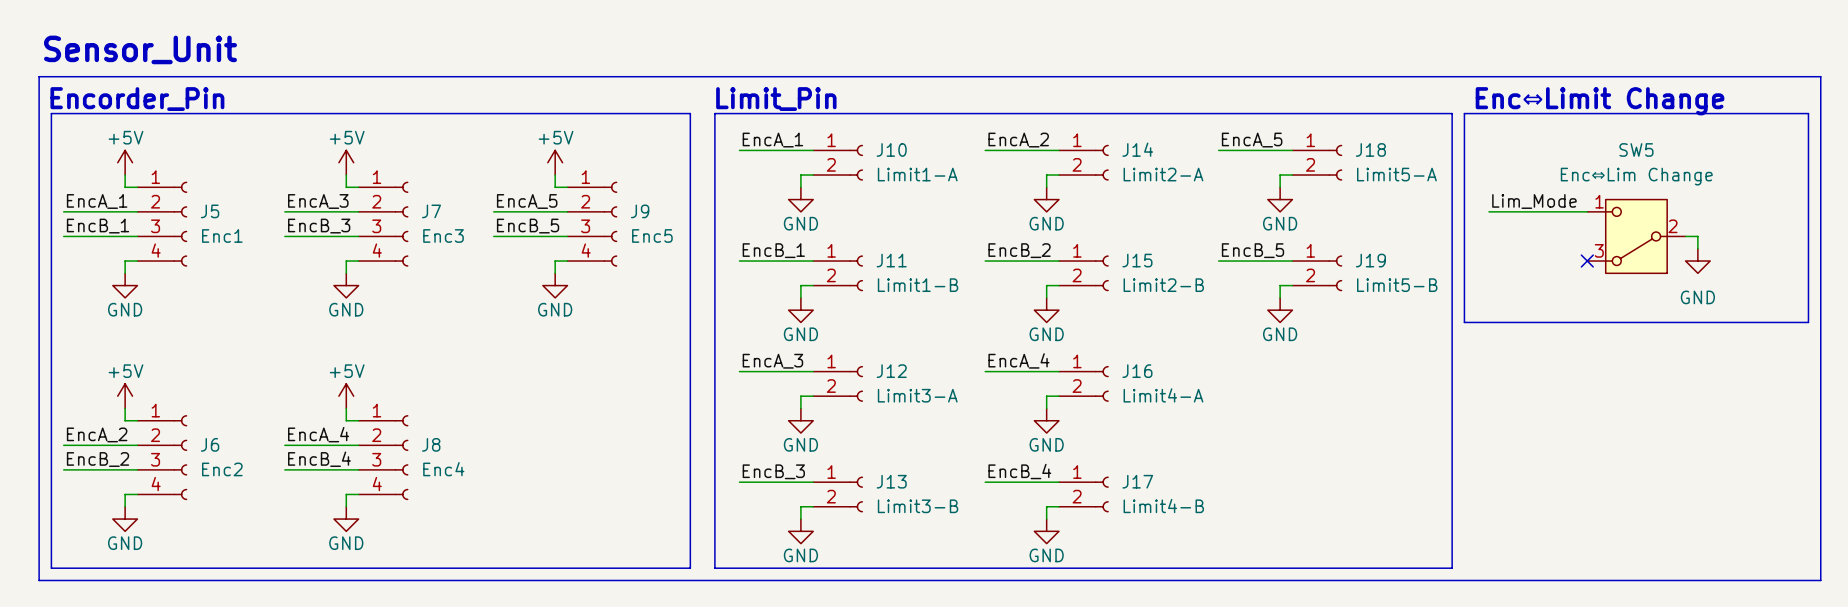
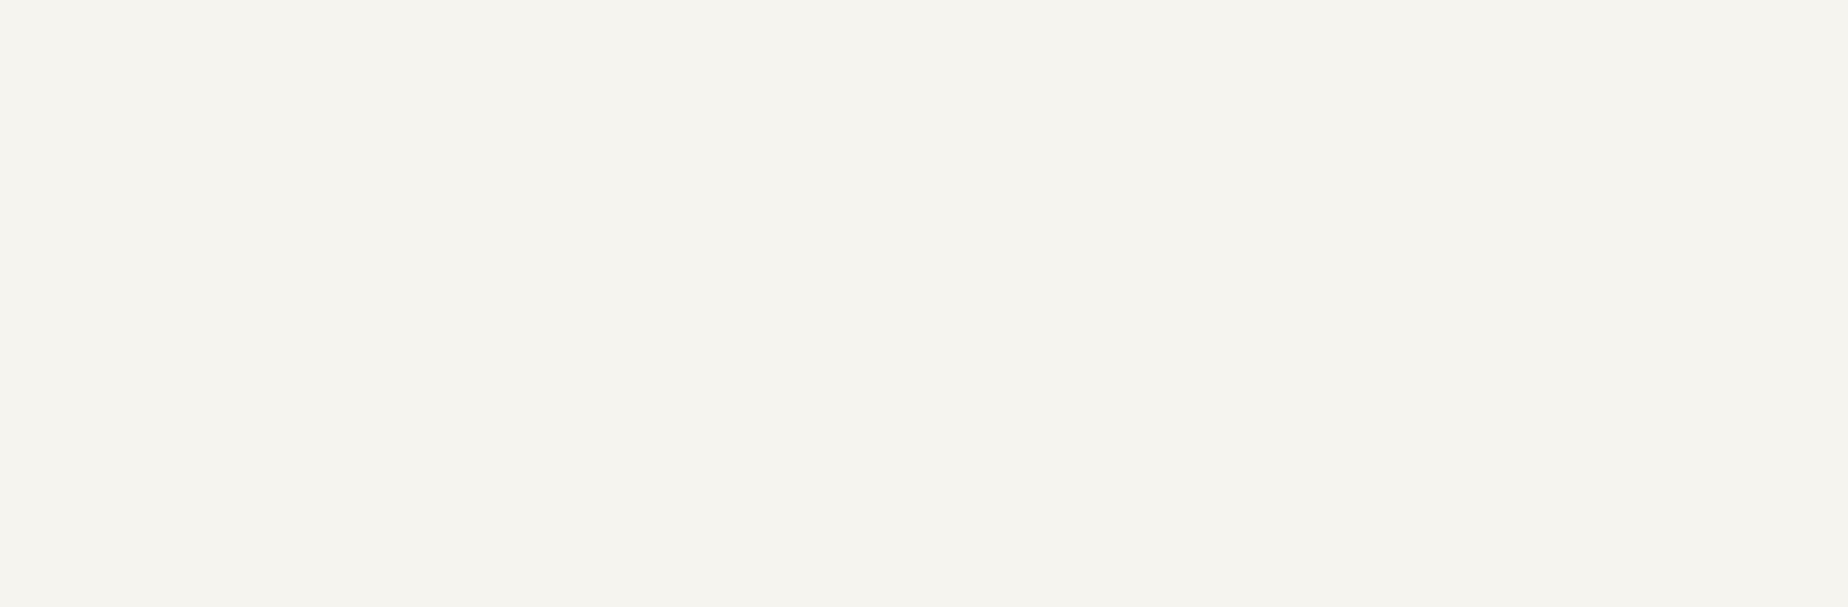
text: Sensor_Unit (140, 49) -> none
line: (39, 76) (1820, 76) (1820, 580) (39, 580) (39, 76) -> none
text: Encorder_Pin (137, 99) -> none
text: Limit_Pin (776, 99) -> none
text: Enc⇔Limit Change (1600, 101) -> none
line: (51, 113) (690, 113) (690, 568) (51, 568) (51, 113) -> none
line: (714, 113) (1452, 113) (1452, 568) (714, 568) (714, 113) -> none
line: (1464, 113) (1808, 113) (1808, 322) (1464, 322) (1464, 113) -> none
label: EncA_1 (772, 140) -> none
label: EncA_2 (1018, 140) -> none
label: EncA_5 (1252, 140) -> none
wire: (739, 150) (813, 150) -> none
wire: (985, 150) (1058, 150) -> none
wire: (1218, 150) (1292, 150) -> none
power symbol: +5V (125, 162) -> none
power symbol: +5V (346, 162) -> none
power symbol: +5V (555, 162) -> none
J10: Limit1-A (838, 162) -> none
J14: Limit2-A (1083, 162) -> none
J18: Limit5-A (1317, 162) -> none
wire: (125, 175) (125, 187) (137, 187) -> none
wire: (346, 175) (346, 187) (358, 187) -> none
wire: (555, 175) (555, 187) (567, 187) -> none
wire: (813, 175) (800, 175) (800, 187) -> none
wire: (1058, 175) (1046, 175) (1046, 187) -> none
wire: (1292, 175) (1280, 175) (1280, 187) -> none
power symbol: GND (800, 199) -> none
power symbol: GND (1046, 199) -> none
power symbol: GND (1280, 199) -> none
label: EncA_1 (97, 201) -> none
label: EncA_3 (318, 201) -> none
label: EncA_5 (527, 201) -> none
label: Lim_Mode (1534, 201) -> none
wire: (63, 211) (137, 211) -> none
wire: (284, 211) (358, 211) -> none
wire: (493, 211) (567, 211) -> none
wire: (1489, 211) (1587, 211) -> none
J5: Enc1 (162, 224) -> none
J7: Enc3 (383, 224) -> none
J9: Enc5 (592, 224) -> none
label: EncB_1 (98, 226) -> none
label: EncB_3 (319, 226) -> none
label: EncB_5 (528, 226) -> none
wire: (63, 236) (137, 236) -> none
wire: (284, 236) (358, 236) -> none
wire: (493, 236) (567, 236) -> none
SW5: Enc⇔Lim Change (1636, 236) -> none
wire: (1685, 236) (1697, 236) (1697, 248) -> none
label: EncB_1 (773, 250) -> none
label: EncB_2 (1019, 250) -> none
label: EncB_5 (1253, 250) -> none
wire: (137, 261) (125, 261) (125, 273) -> none
wire: (358, 261) (346, 261) (346, 273) -> none
wire: (567, 261) (555, 261) (555, 273) -> none
wire: (739, 261) (813, 261) -> none
wire: (985, 261) (1058, 261) -> none
wire: (1218, 261) (1292, 261) -> none
no-connect mark: (1587, 261) -> none
power symbol: GND (1697, 261) -> none
J11: Limit1-B (838, 273) -> none
J15: Limit2-B (1083, 273) -> none
J19: Limit5-B (1317, 273) -> none
power symbol: GND (125, 285) -> none
power symbol: GND (346, 285) -> none
power symbol: GND (555, 285) -> none
wire: (813, 285) (800, 285) (800, 297) -> none
wire: (1058, 285) (1046, 285) (1046, 297) -> none
wire: (1292, 285) (1280, 285) (1280, 297) -> none
power symbol: GND (800, 310) -> none
power symbol: GND (1046, 310) -> none
power symbol: GND (1280, 310) -> none
label: EncA_4 (1018, 360) -> none
label: EncA_3 (772, 361) -> none
wire: (739, 371) (813, 371) -> none
wire: (985, 371) (1058, 371) -> none
J12: Limit3-A (838, 383) -> none
J16: Limit4-A (1083, 383) -> none
power symbol: +5V (125, 396) -> none
power symbol: +5V (346, 396) -> none
wire: (813, 396) (800, 396) (800, 408) -> none
wire: (1058, 396) (1046, 396) (1046, 408) -> none
wire: (125, 408) (125, 420) (137, 420) -> none
wire: (346, 408) (346, 420) (358, 420) -> none
power symbol: GND (800, 420) -> none
power symbol: GND (1046, 420) -> none
label: EncA_2 (97, 434) -> none
label: EncA_4 (318, 434) -> none
wire: (63, 445) (137, 445) -> none
wire: (284, 445) (358, 445) -> none
J6: Enc2 (162, 457) -> none
J8: Enc4 (383, 457) -> none
label: EncB_2 (98, 459) -> none
label: EncB_4 (319, 459) -> none
wire: (63, 469) (137, 469) -> none
wire: (284, 469) (358, 469) -> none
label: EncB_3 (773, 471) -> none
label: EncB_4 (1019, 471) -> none
wire: (739, 482) (813, 482) -> none
wire: (985, 482) (1058, 482) -> none
wire: (137, 494) (125, 494) (125, 506) -> none
wire: (358, 494) (346, 494) (346, 506) -> none
J13: Limit3-B (838, 494) -> none
J17: Limit4-B (1083, 494) -> none
wire: (813, 506) (800, 506) (800, 519) -> none
wire: (1058, 506) (1046, 506) (1046, 519) -> none
power symbol: GND (125, 519) -> none
power symbol: GND (346, 519) -> none
power symbol: GND (800, 531) -> none
power symbol: GND (1046, 531) -> none

